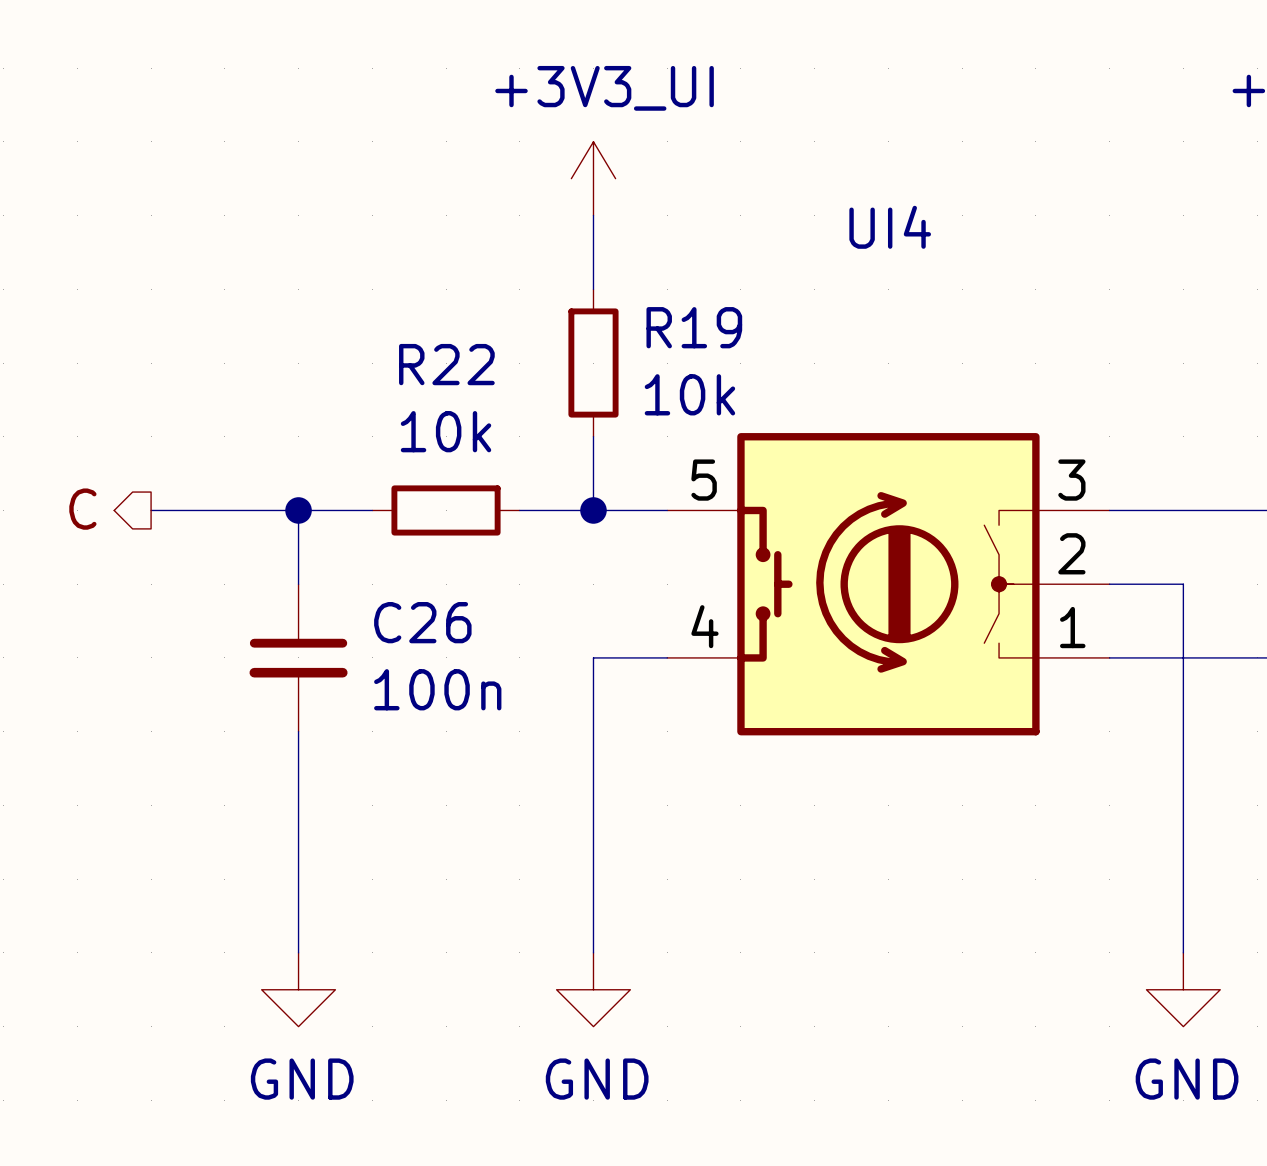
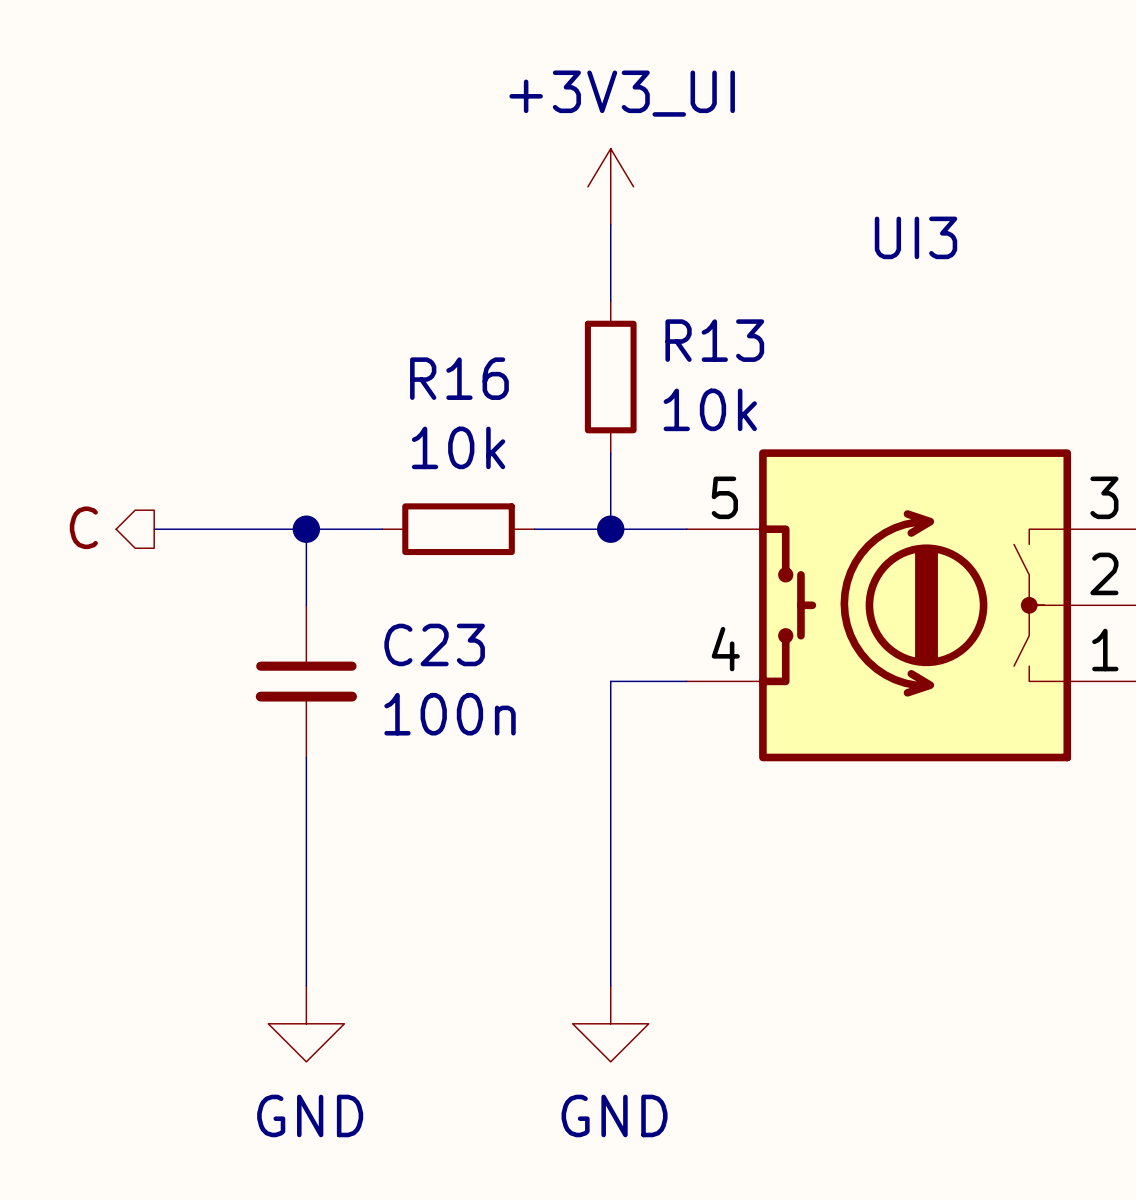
UI4 name: UI4 (890, 227) -> UI3 (916, 237)
R19 name: R19 (694, 327) -> R13 (714, 340)
R22 name: R22 (446, 364) -> R16 (459, 378)
C26 name: C26 (422, 622) -> C23 (434, 644)

